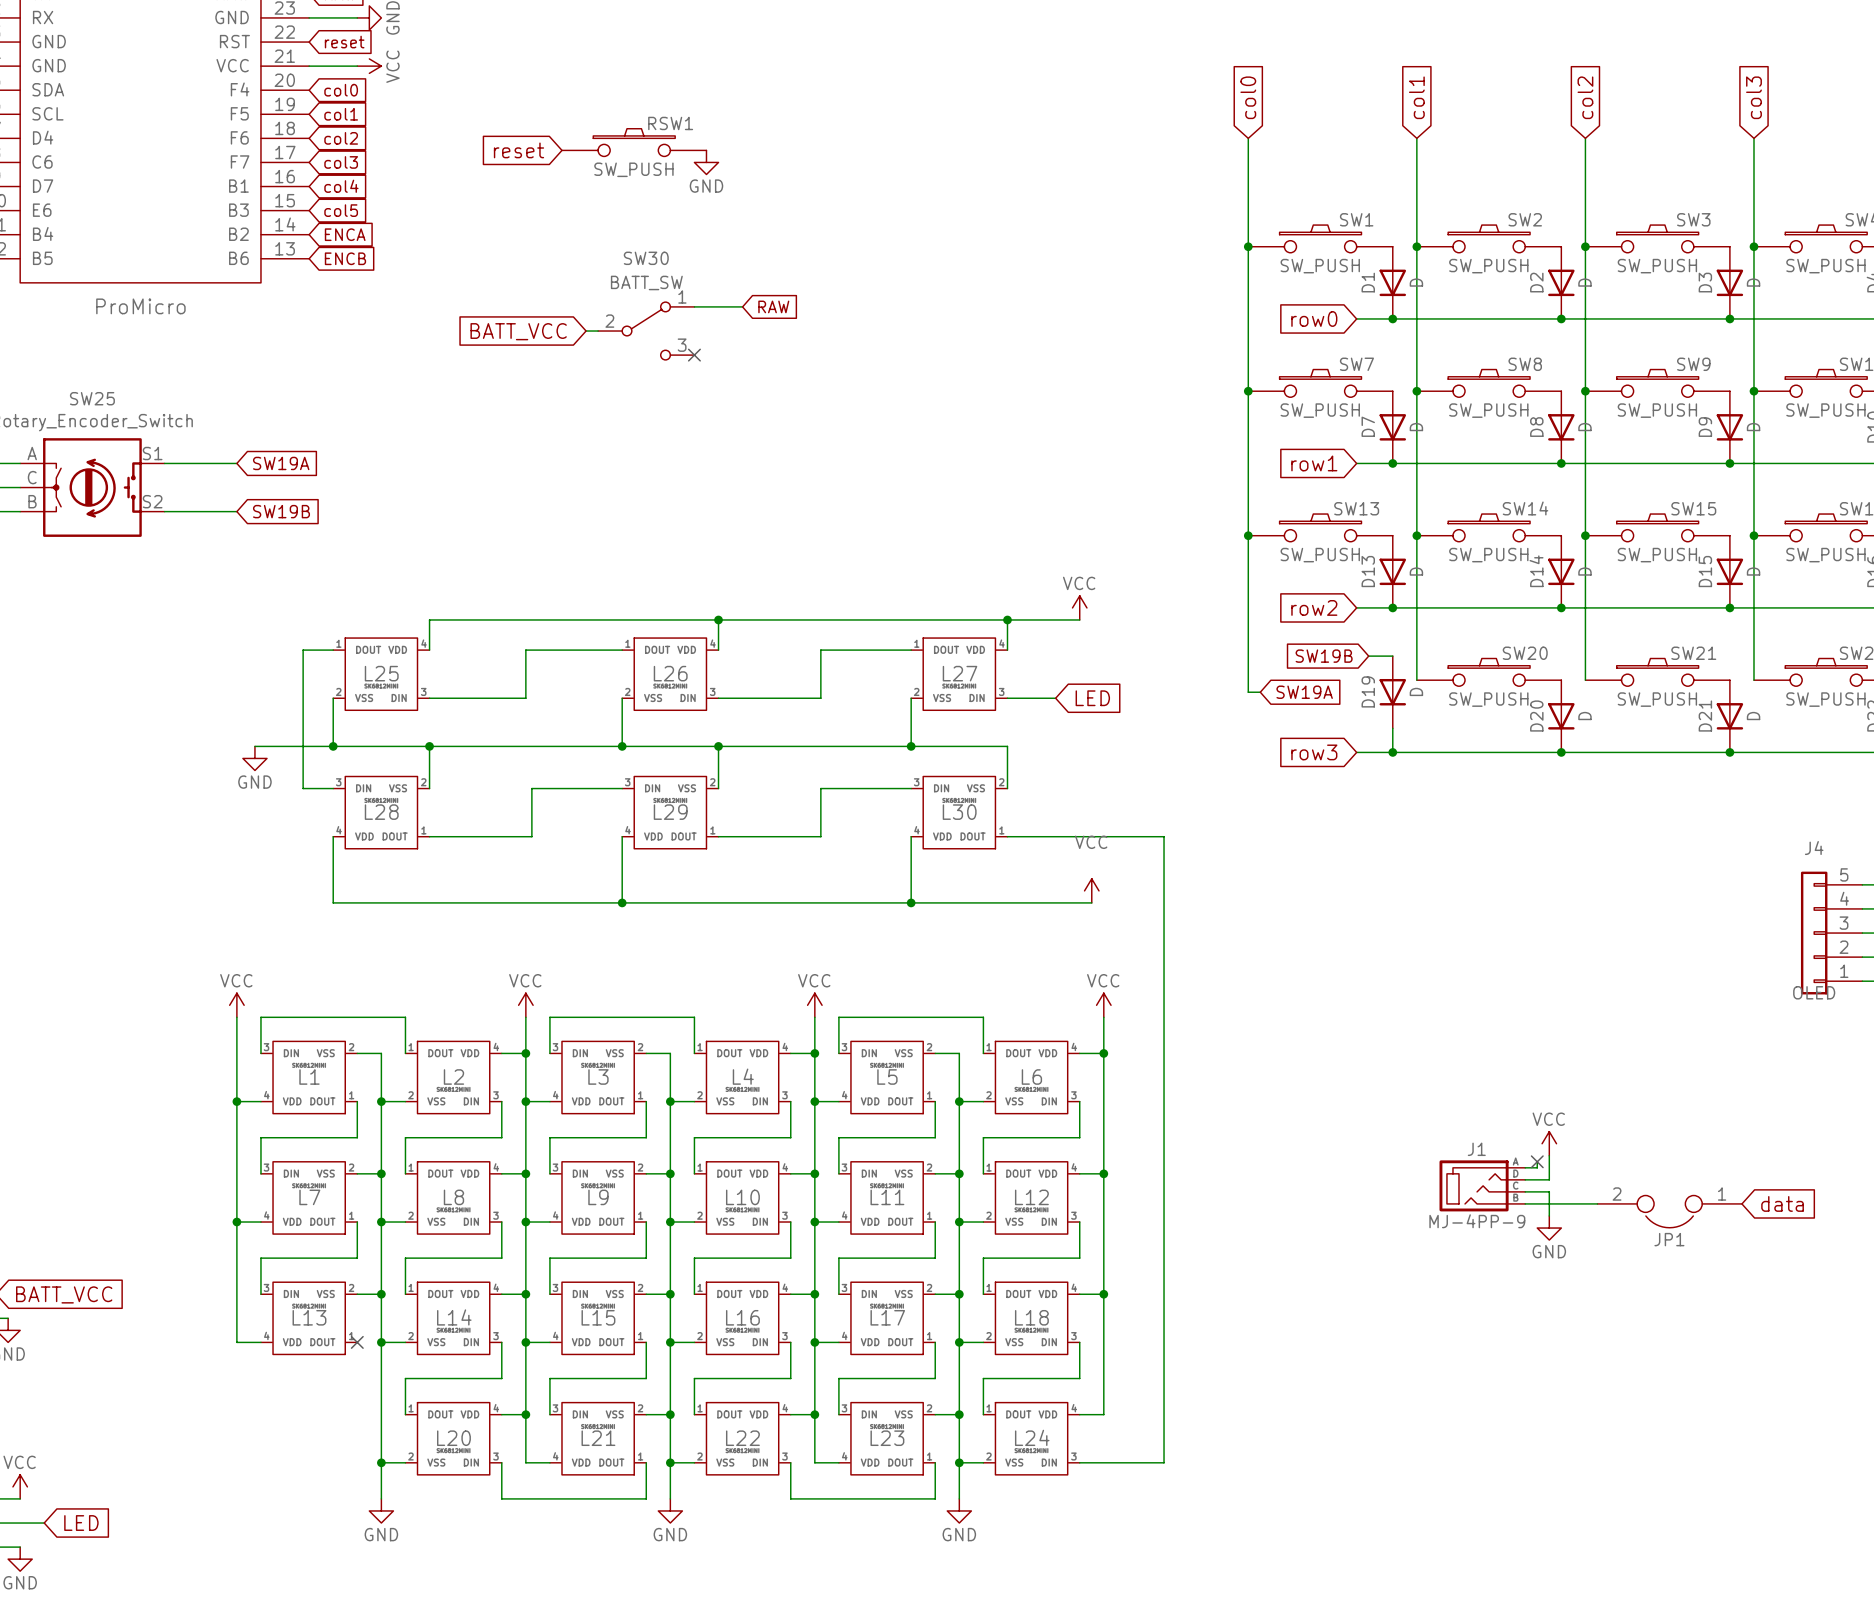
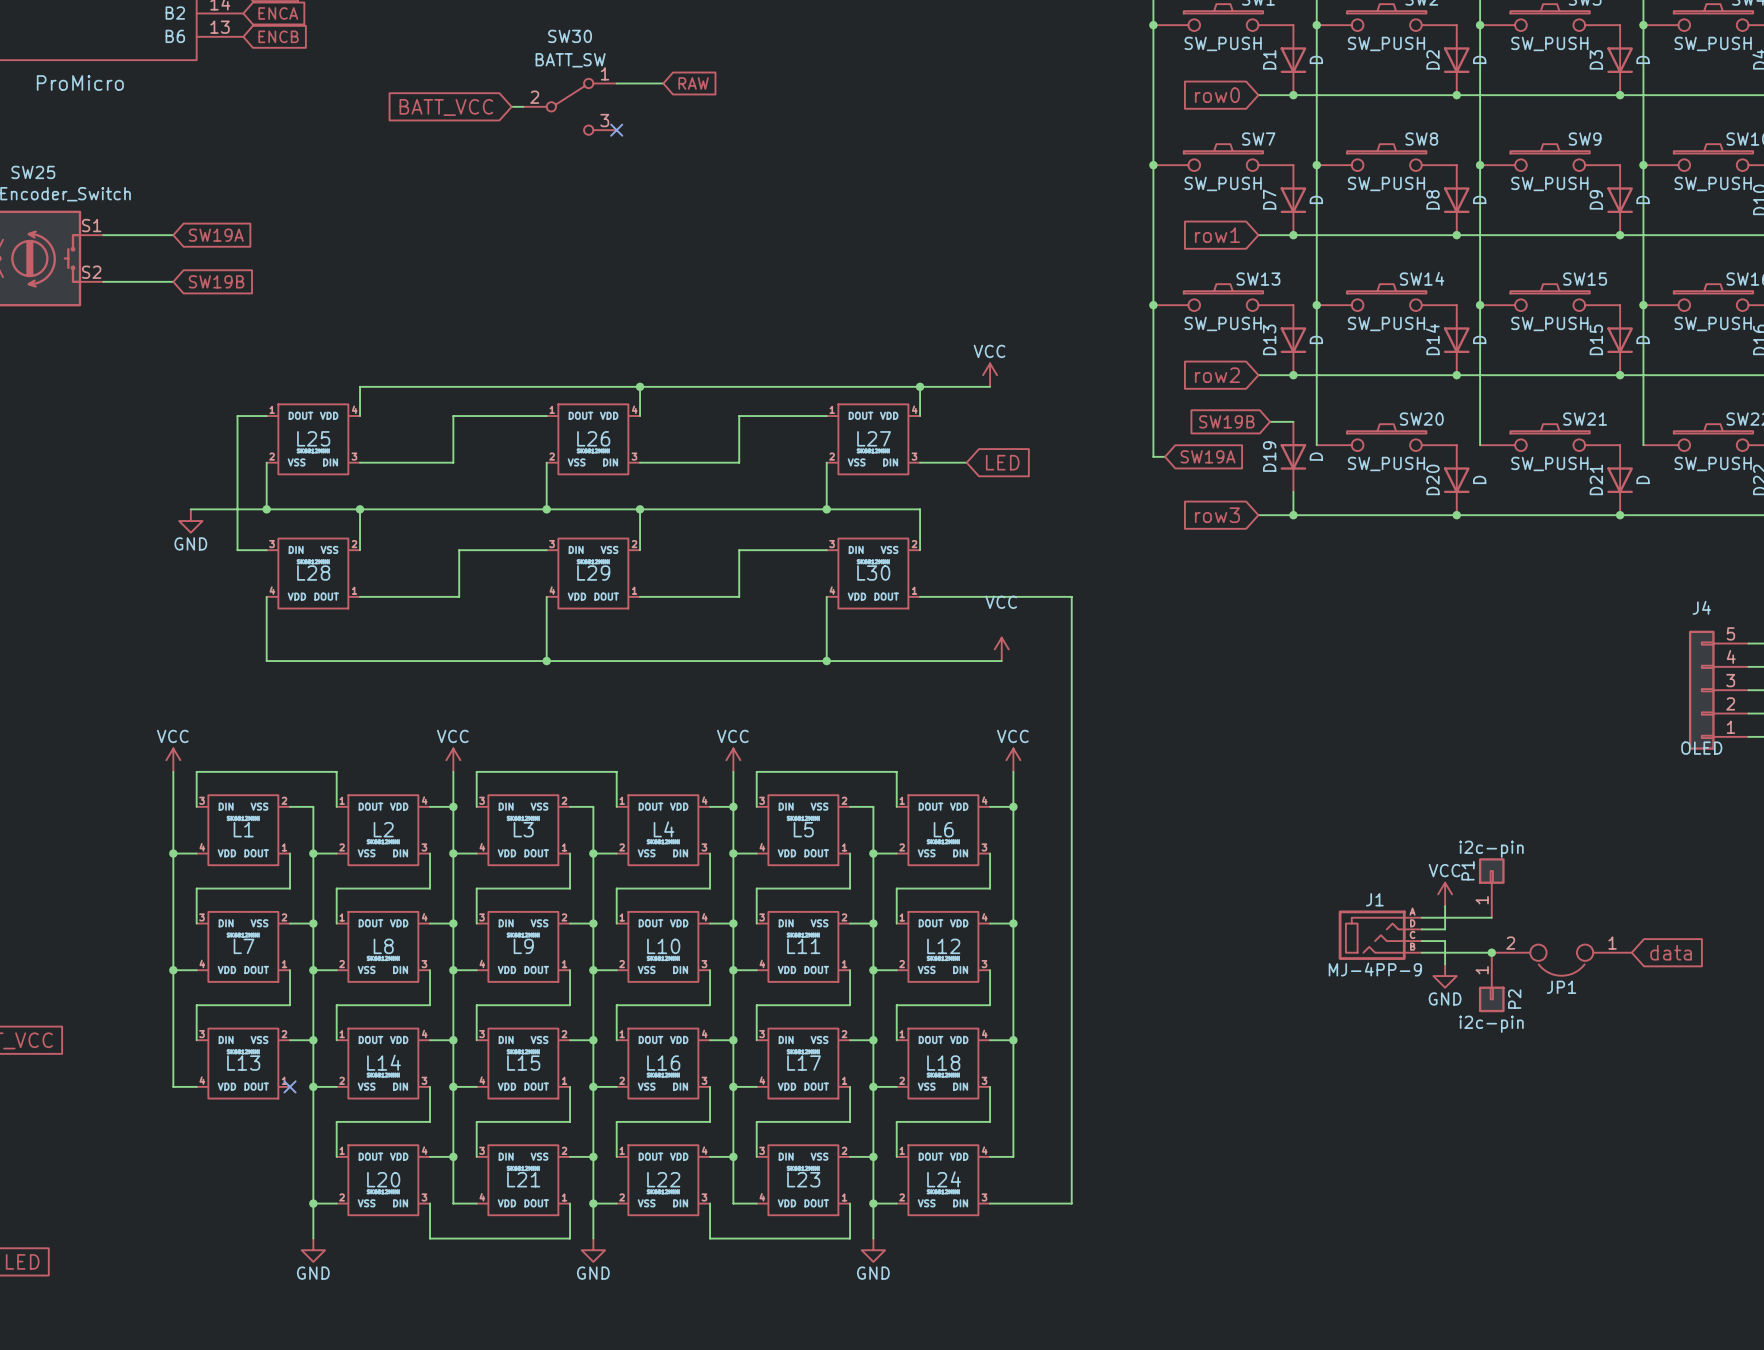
P1: none -> i2c-pin (1491, 887)
wire: (1537, 1161) (1537, 1167) -> (1491, 917) (1433, 917)
no-connect mark: (1537, 1161) -> none
junction: none -> (1491, 952)
P2: none -> i2c-pin (1491, 982)

